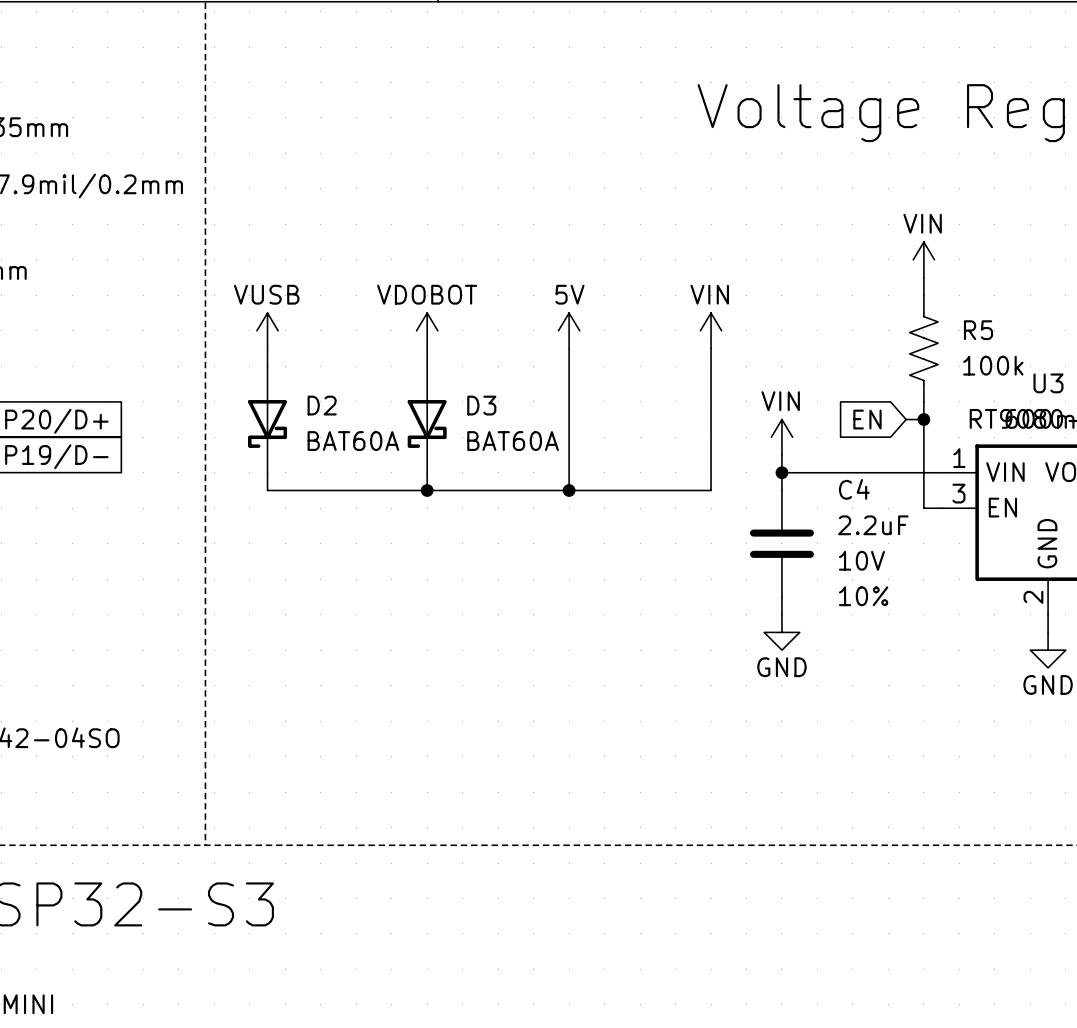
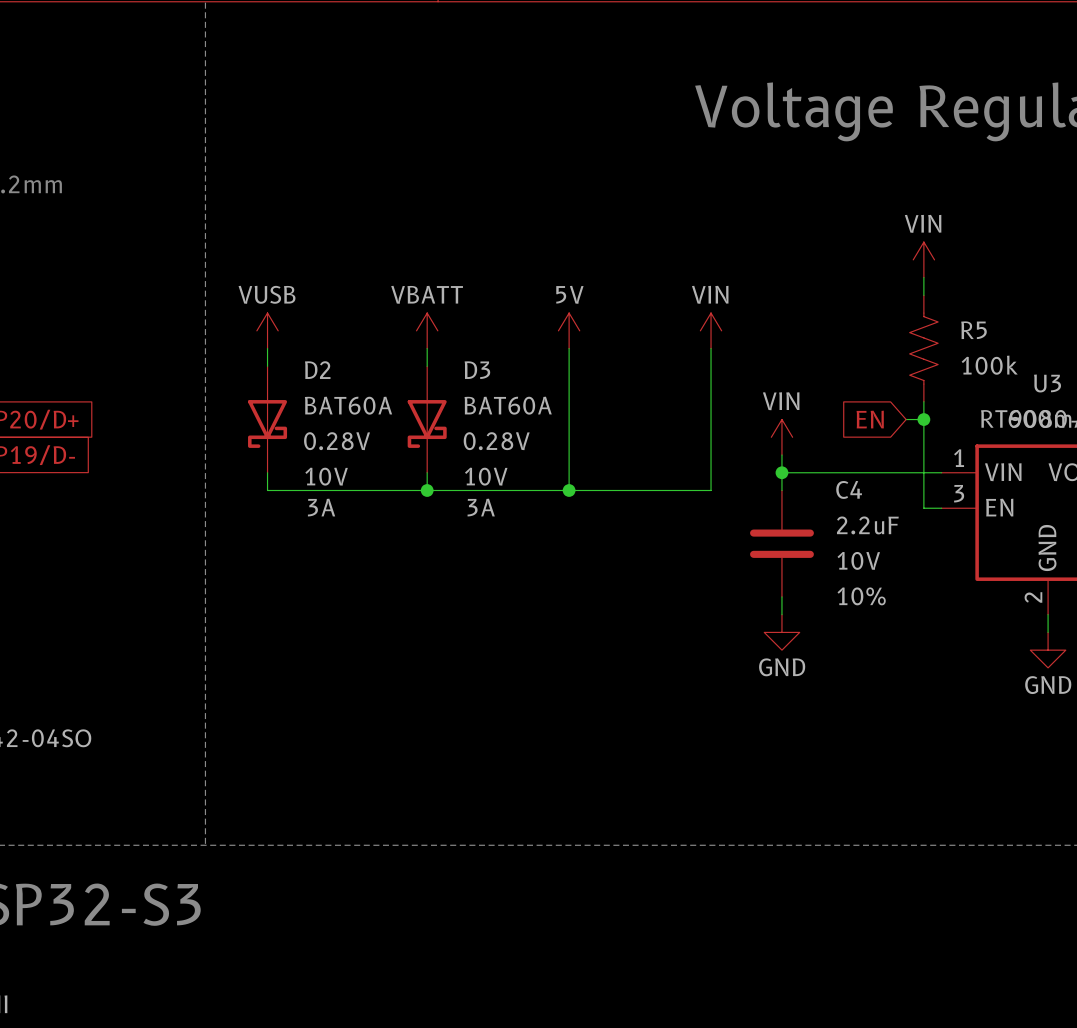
power symbol: VDOBOT (427, 330) -> VBATT (427, 330)
D2 name position: D2 (322, 405) -> D2 (317, 370)
D3 name position: D3 (481, 405) -> D3 (477, 370)
D2 text: none -> 0.28V (337, 441)
D2 value position: BAT60A (353, 441) -> BAT60A (348, 405)
D3 text: none -> 0.28V (496, 441)
D3 value position: BAT60A (513, 441) -> BAT60A (508, 405)
D2 text: none -> 10V (326, 476)
D3 text: none -> 10V (486, 476)
D2 text: none -> 3A (321, 507)
D3 text: none -> 3A (481, 507)

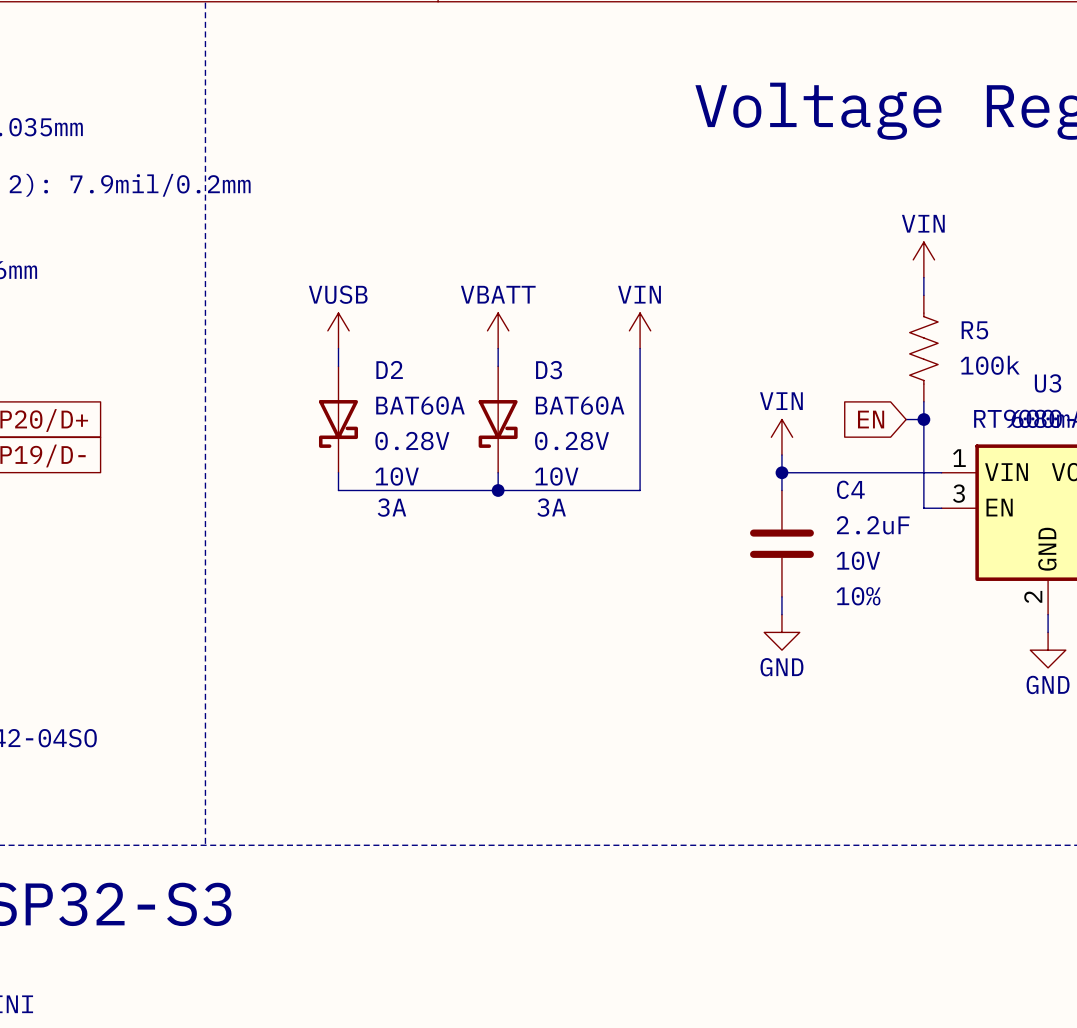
power symbol position: VUSB (267, 330) -> VUSB (338, 330)
power symbol position: VBATT (427, 330) -> VBATT (498, 330)
power symbol: 5V (569, 330) -> none
power symbol position: VIN (711, 330) -> VIN (640, 330)
wire: (267, 348) (267, 366) -> (338, 348) (338, 366)
wire: (427, 348) (427, 366) -> (498, 348) (498, 366)
wire: (569, 348) (569, 490) -> none
wire: (711, 348) (711, 490) (640, 490) -> (640, 348) (640, 490)
D2 position: (267, 419) -> (338, 419)
D3 position: (427, 419) -> (498, 419)
wire: (267, 472) (267, 490) (338, 490) -> (338, 472) (338, 490)
wire: (427, 472) (427, 490) -> (498, 472) (498, 490)
junction: (427, 490) -> none
junction: none -> (498, 490)
junction: (569, 490) -> none

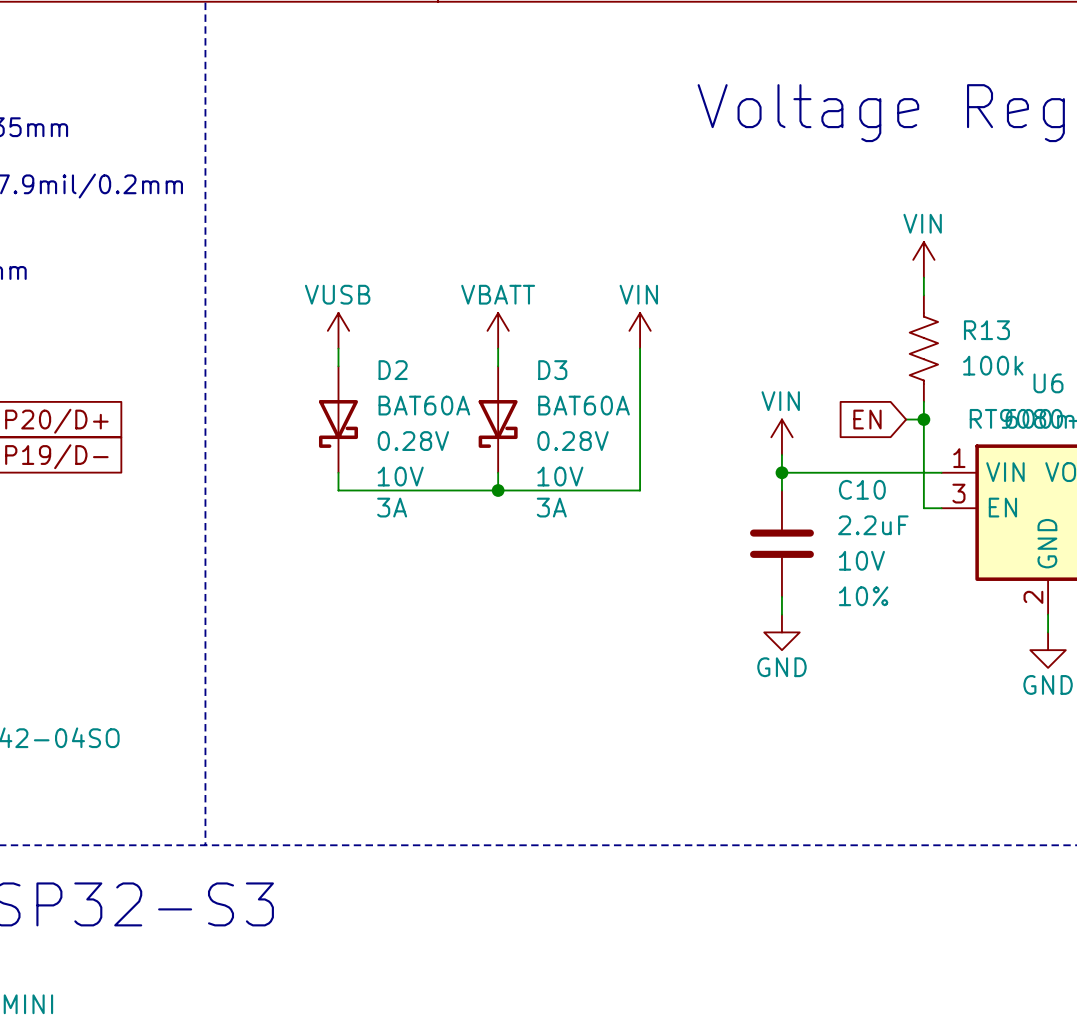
R5 name: R5 (974, 330) -> R13 (986, 330)
U3 name: U3 (1048, 383) -> U6 (1048, 383)
C4 name: C4 (850, 489) -> C10 (862, 489)

